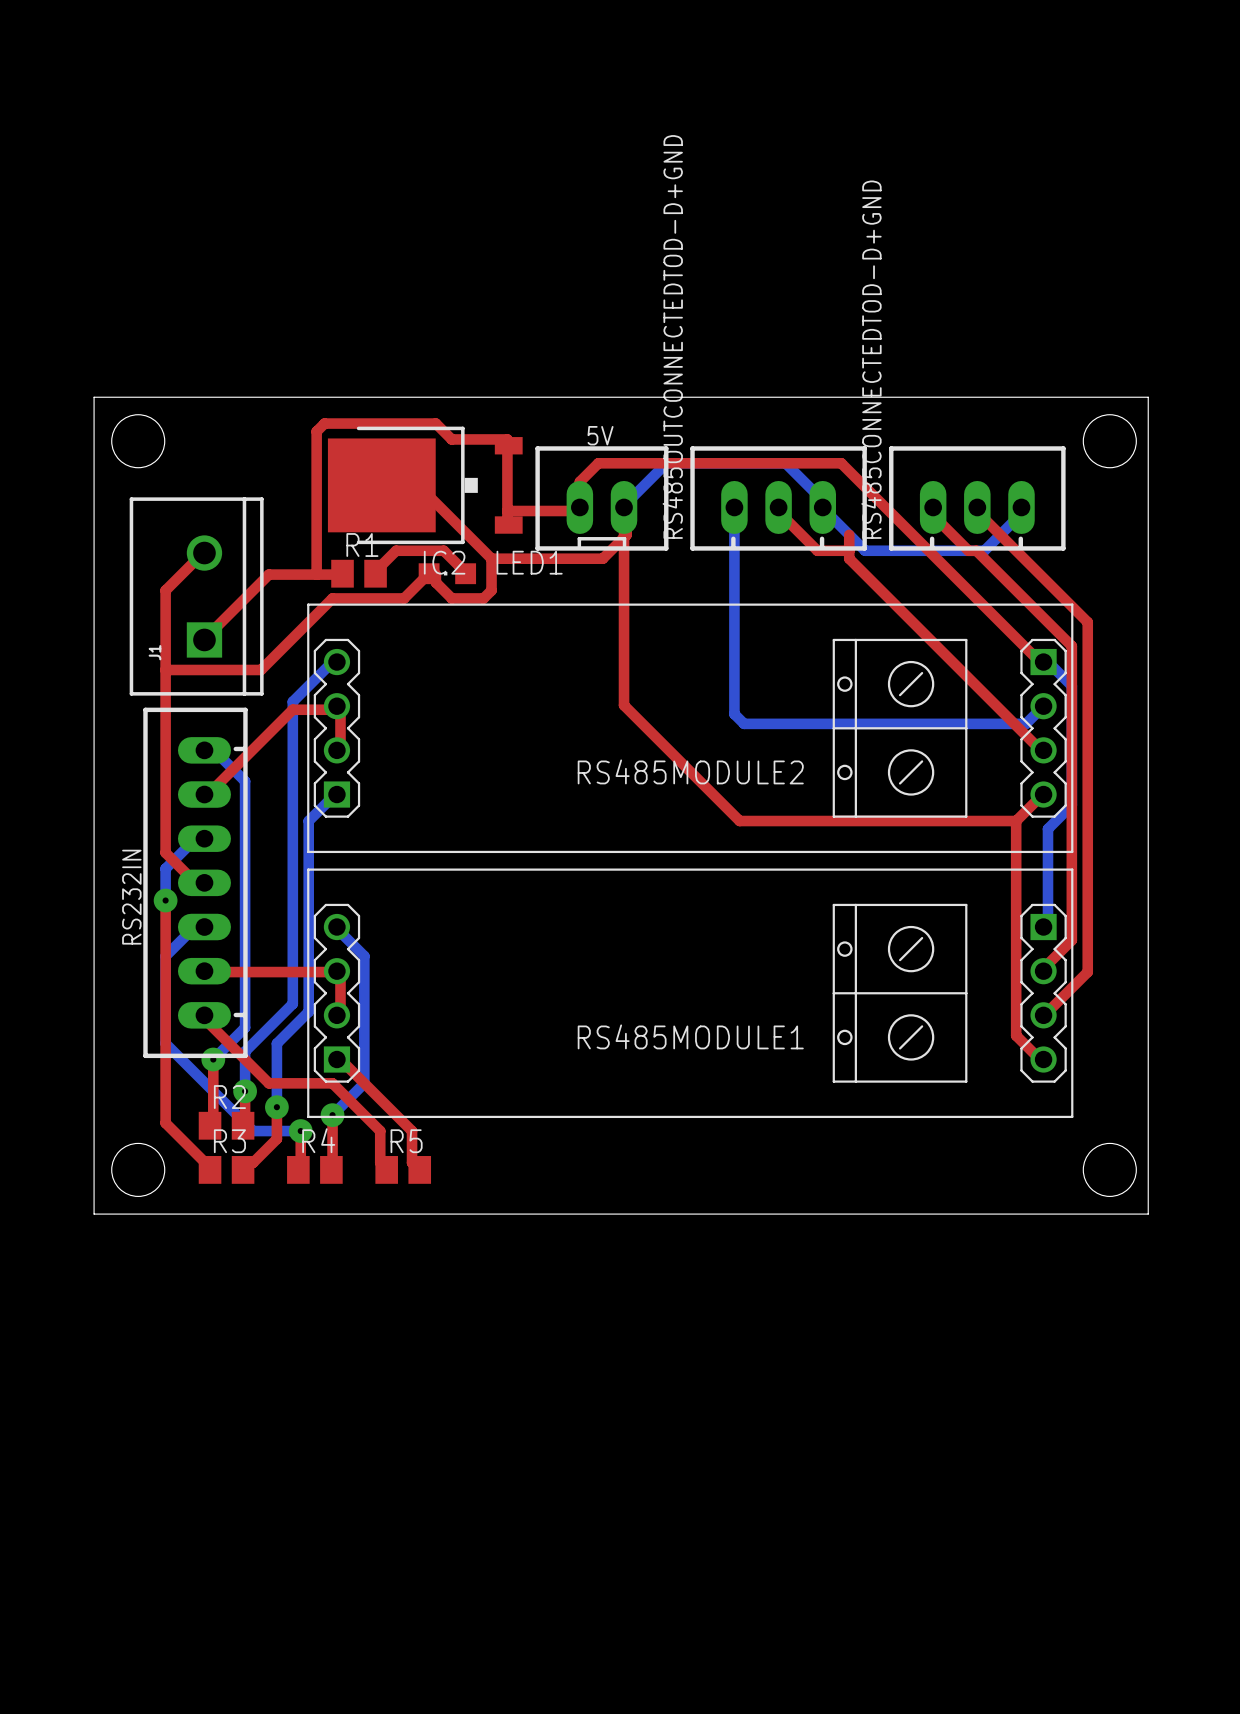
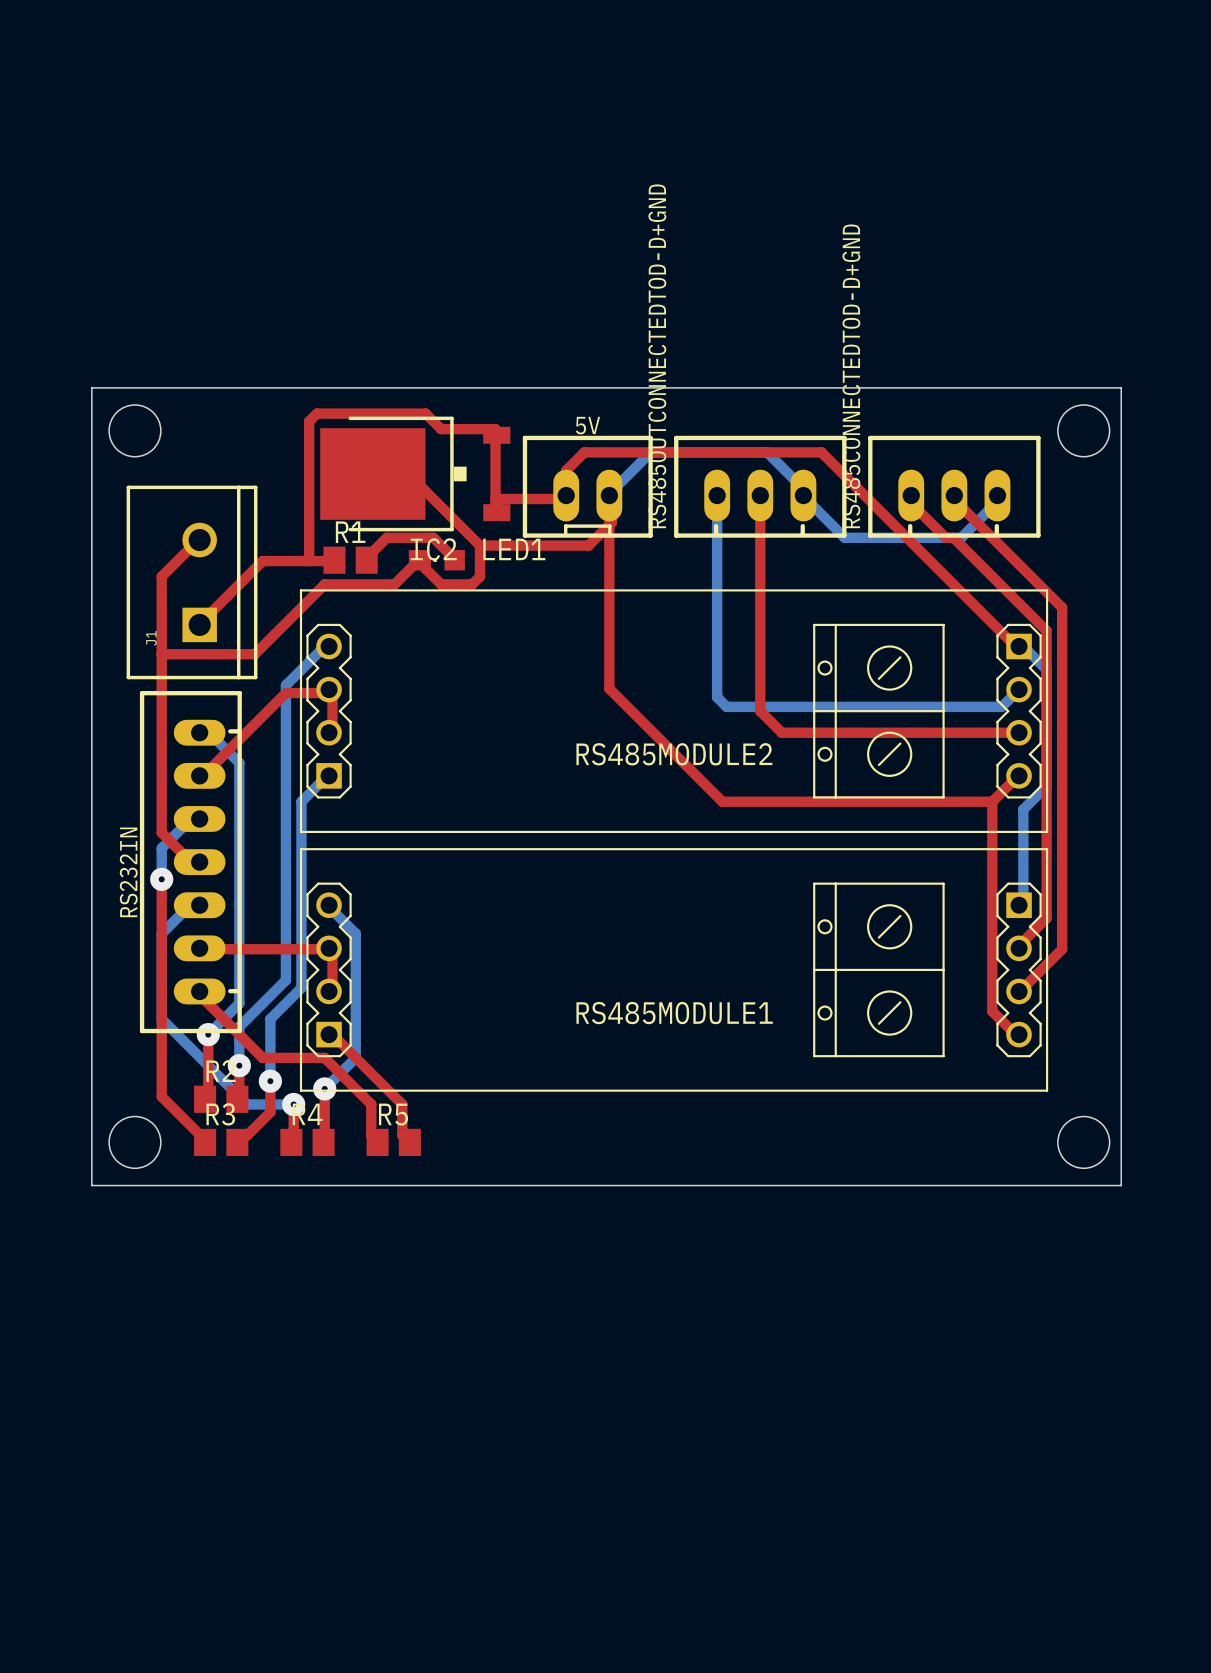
top track: (778, 507) (785, 511) (785, 518) (817, 550) (849, 550) -> none
top track: (849, 534) (849, 558) (1040, 749) (1043, 750) -> (760, 495) (760, 711) (781, 732) (1019, 732)

